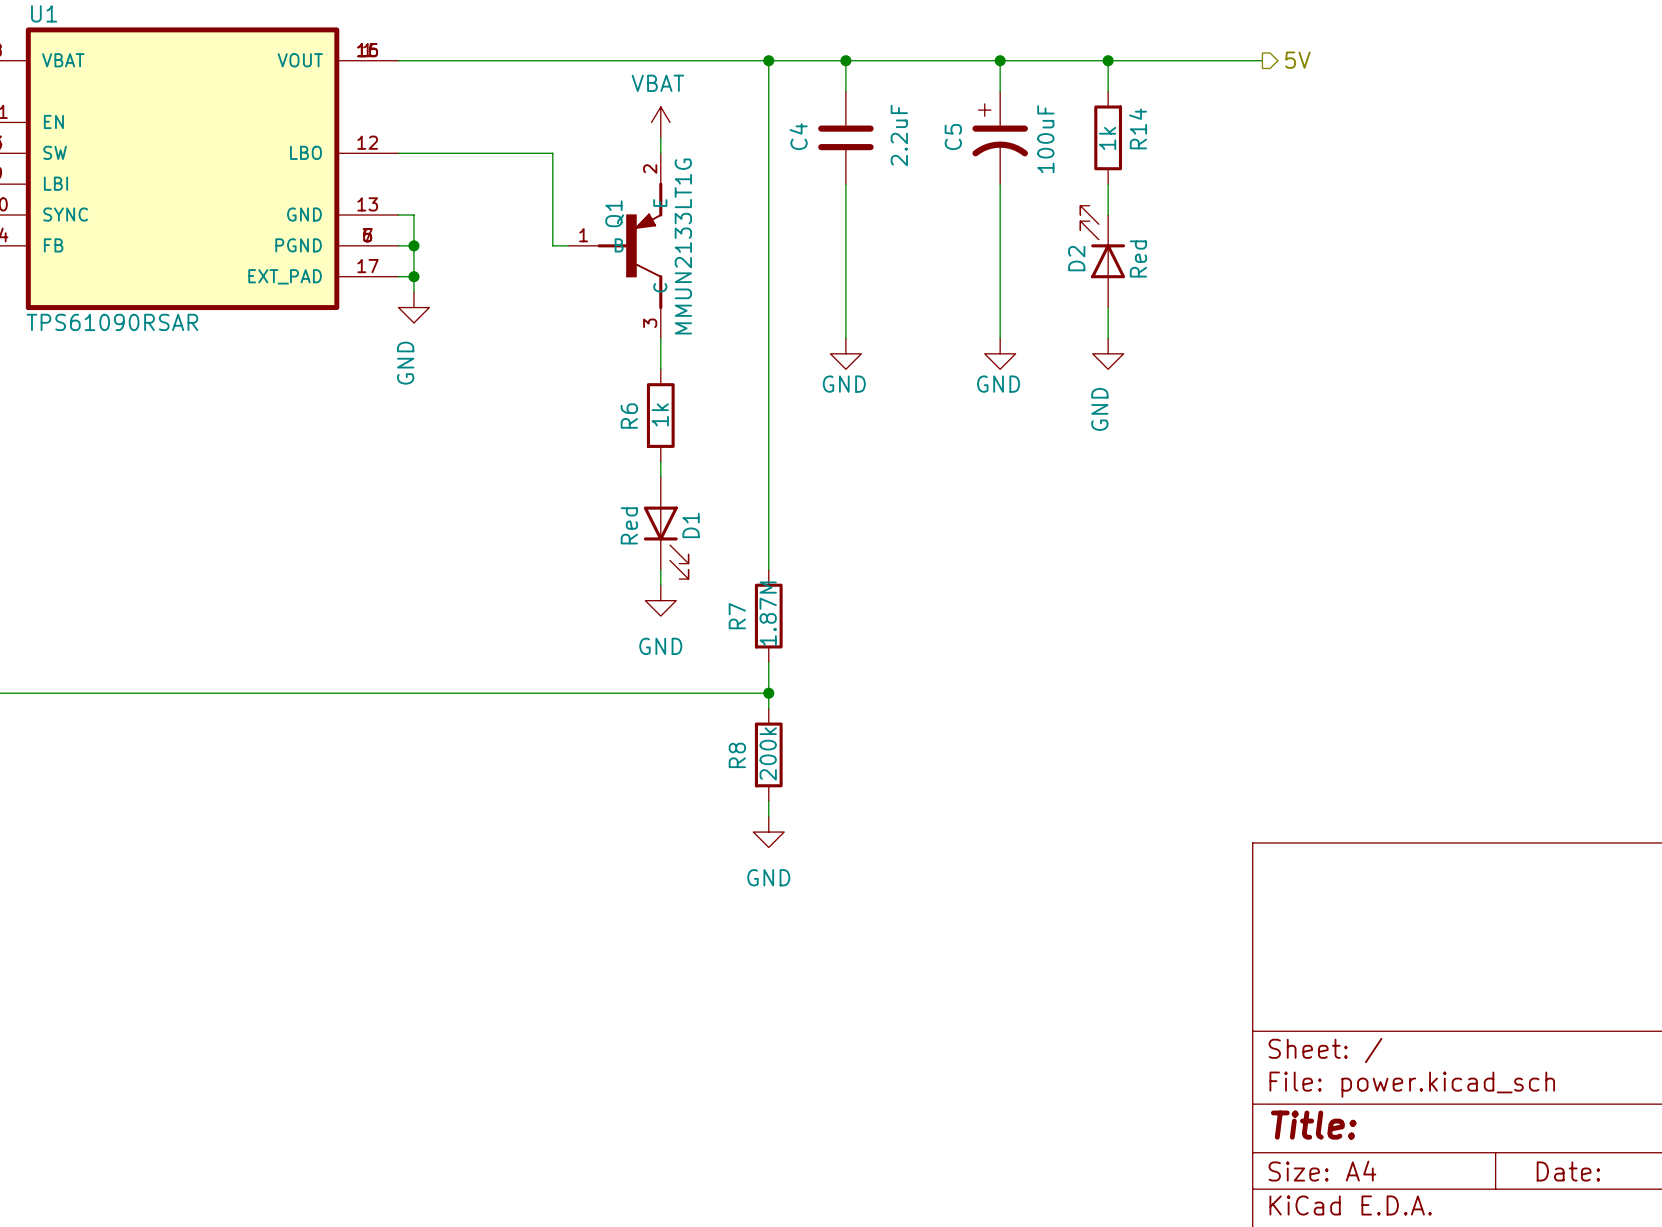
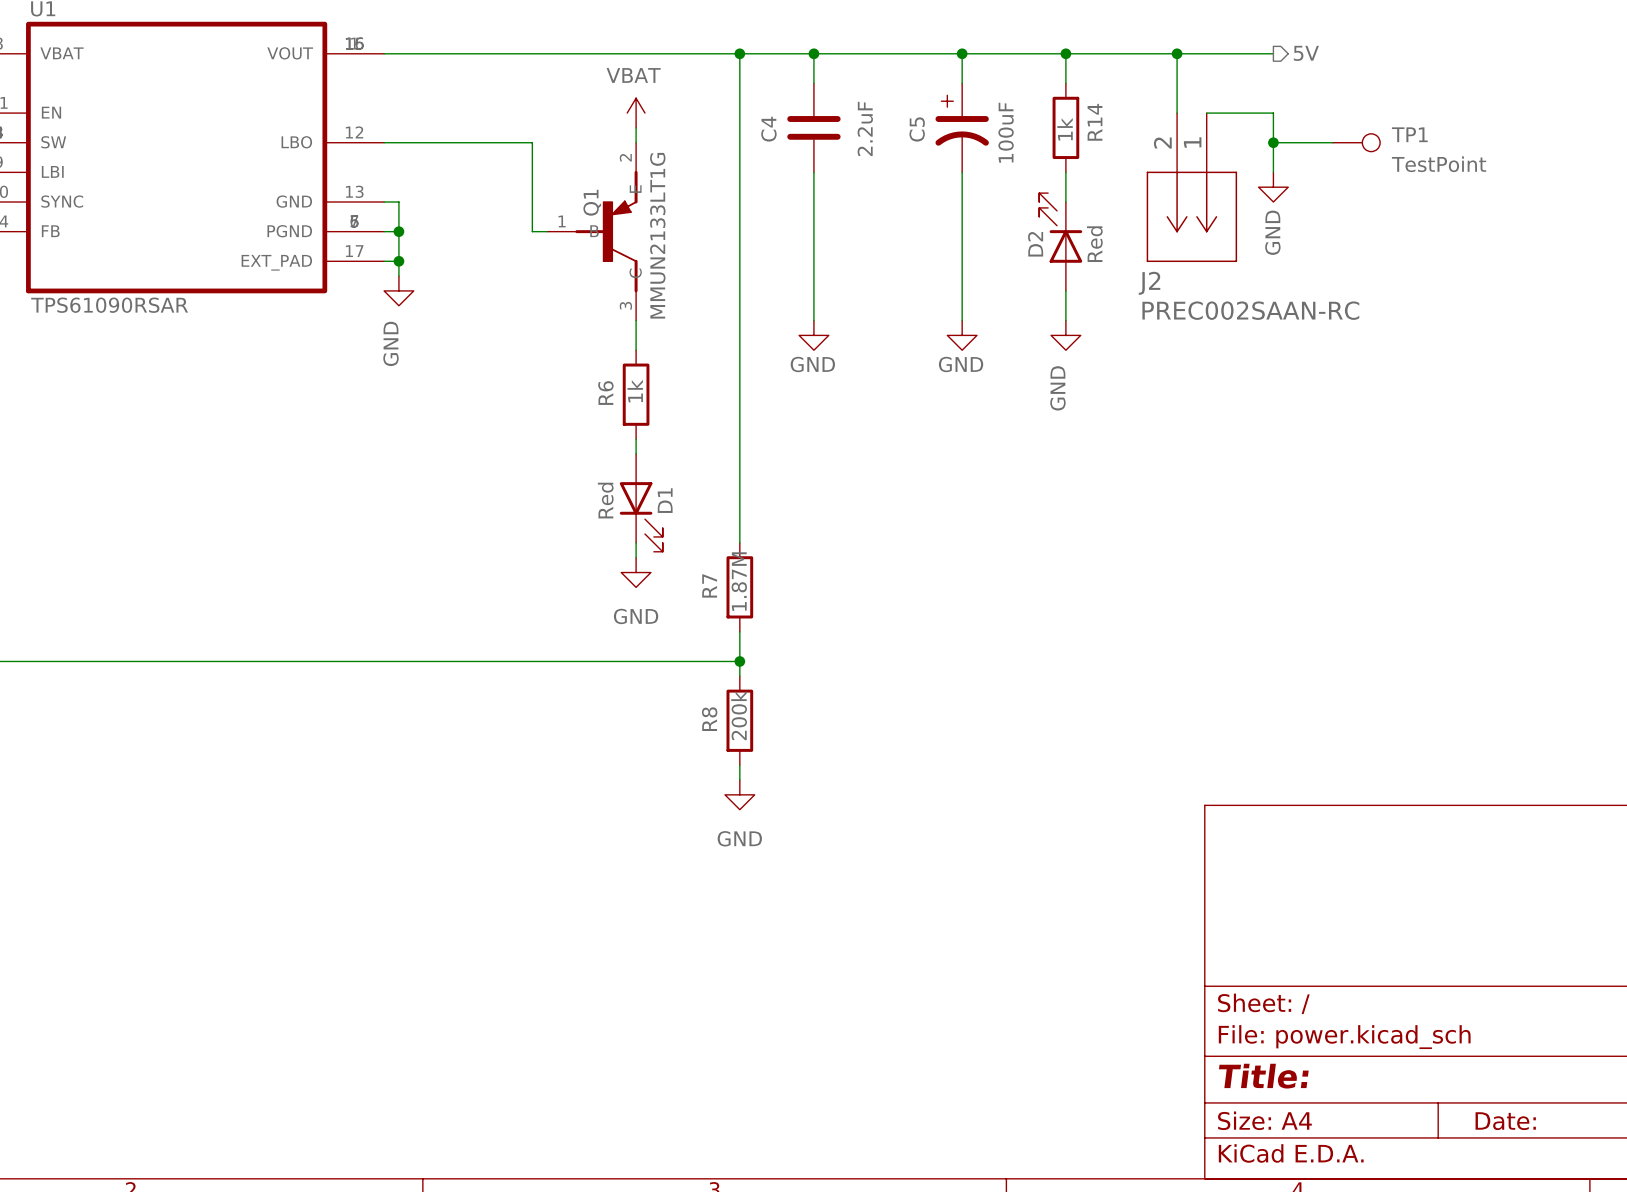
wire: none -> (1177, 53) (1177, 113)
junction: none -> (1177, 53)
wire: none -> (1214, 53) (1273, 53)
hierarchical label position: 5V (1297, 60) -> 5V (1306, 53)
wire: none -> (1206, 113) (1273, 113) (1273, 172)
wire: none -> (1273, 142) (1332, 142)
junction: none -> (1273, 142)
TP1: none -> TestPoint (1356, 142)
J2: none -> PREC002SAAN-RC (1191, 187)
power symbol: none -> GND (1273, 187)

